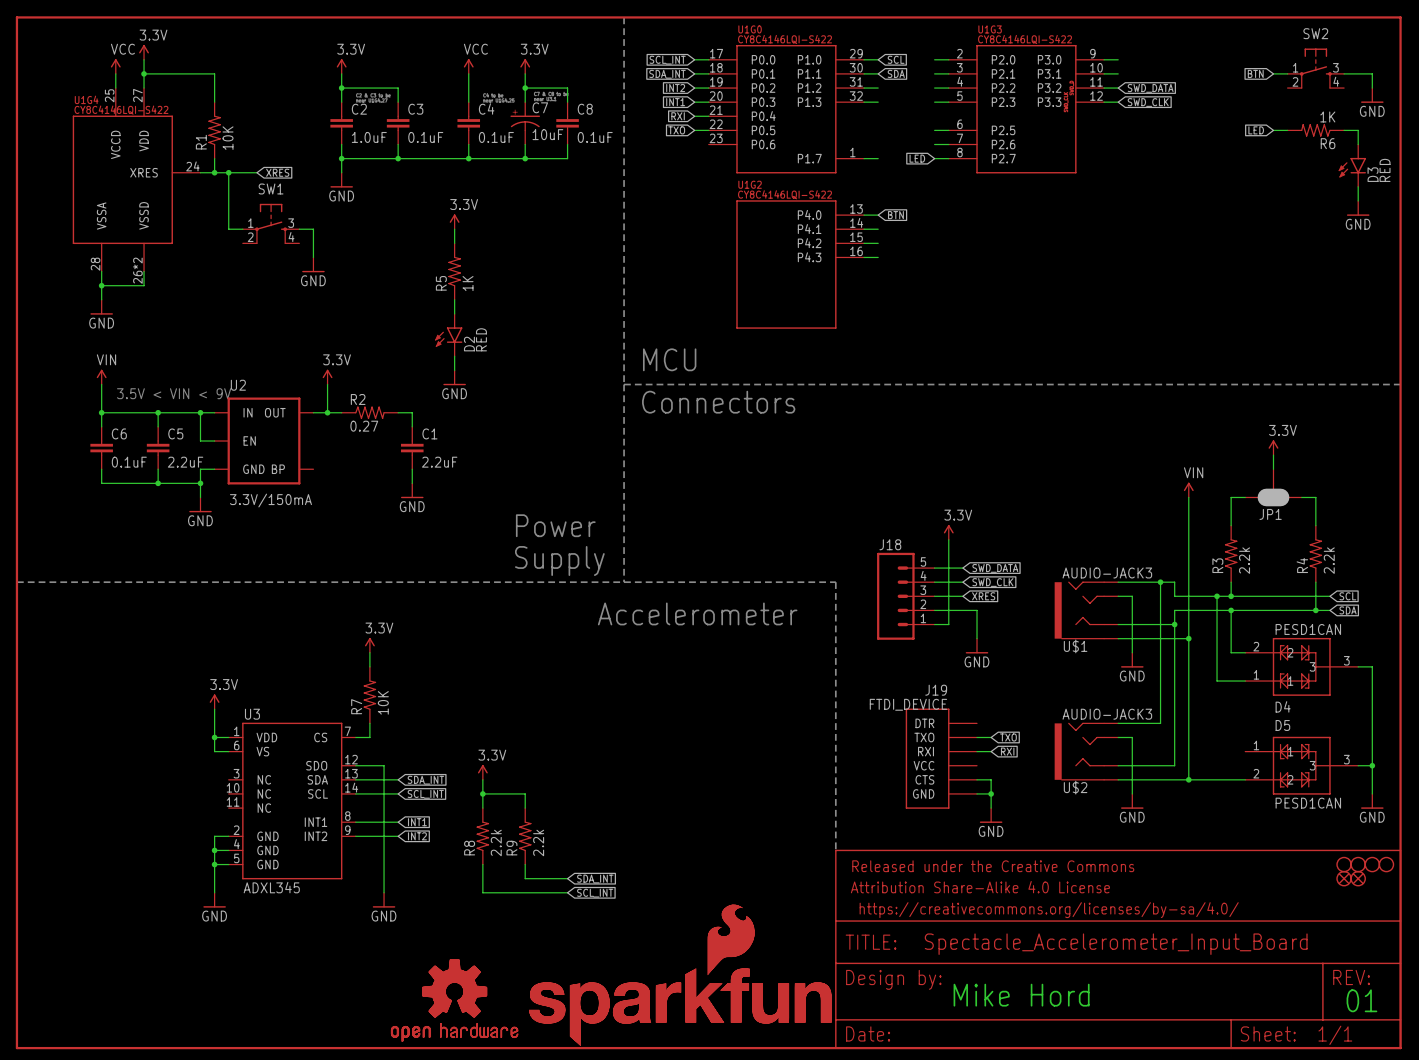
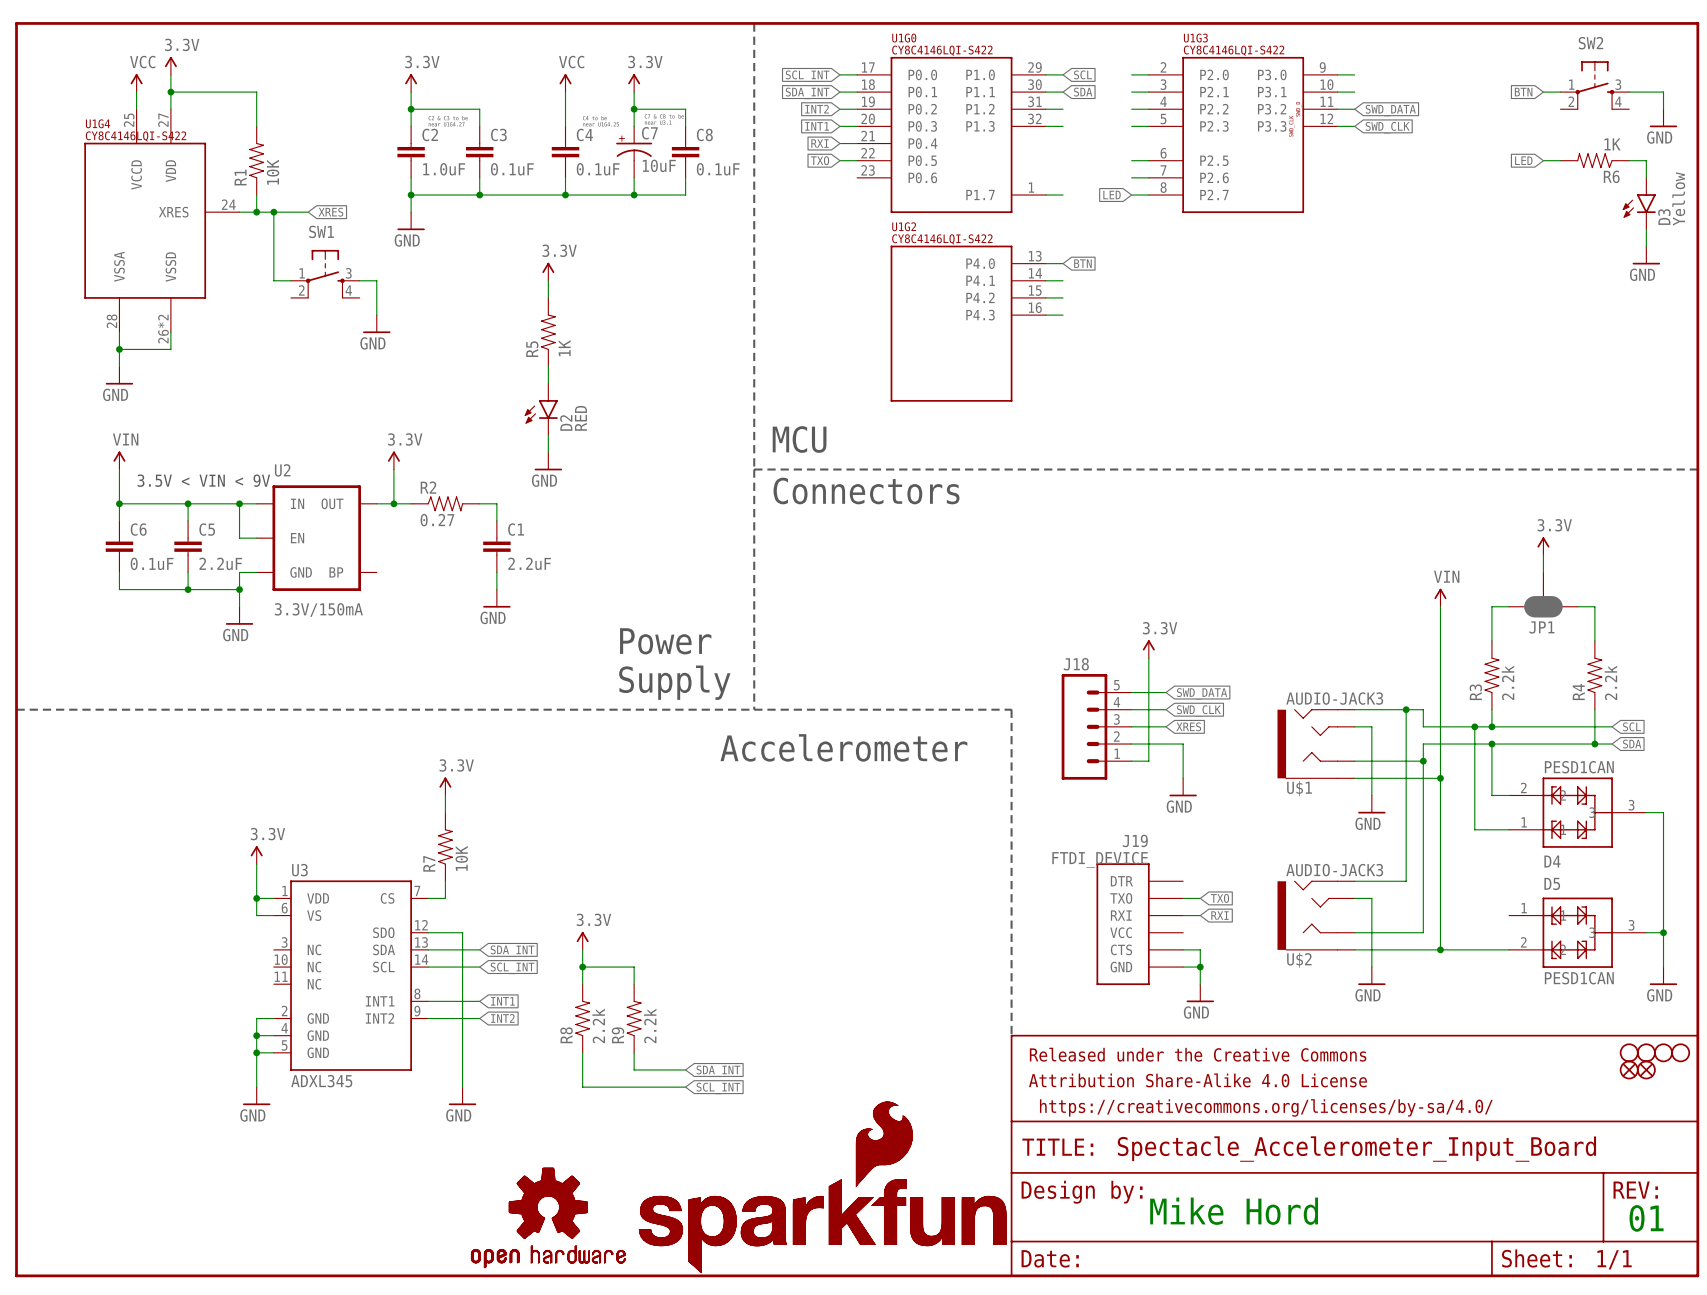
D3 value: RED (1385, 170) -> Yellow (1678, 198)

